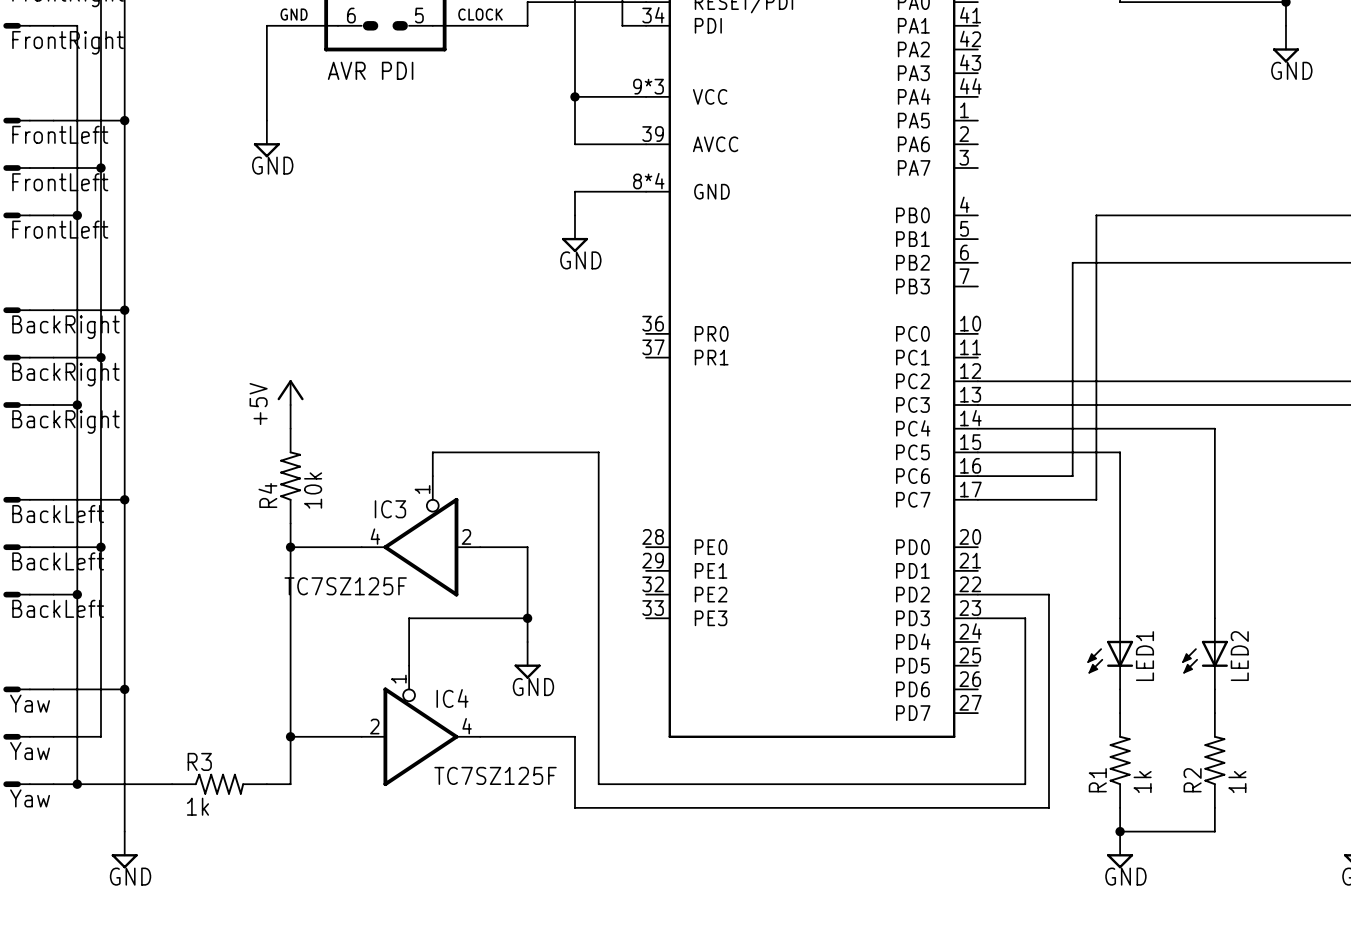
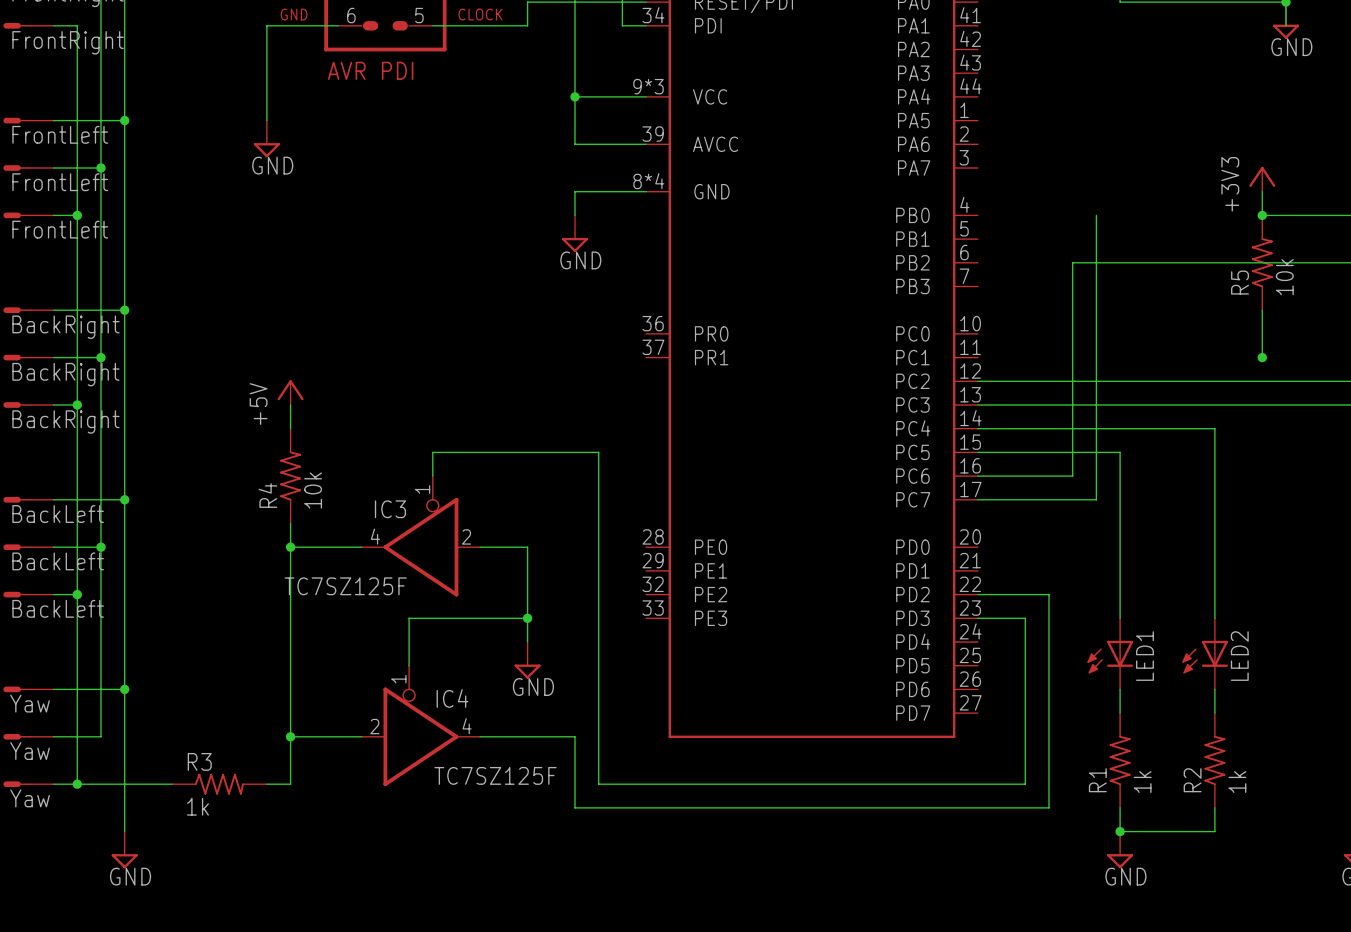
power symbol position: GND (1285, 44) -> GND (1285, 20)
power symbol: none -> +3V3 (1262, 179)
wire: (1096, 215) (1262, 215) -> (1262, 191) (1262, 215)
junction: none -> (1262, 215)
R5: none -> 10k (1262, 262)
wire: none -> (1262, 310) (1262, 357)
junction: none -> (1262, 357)

